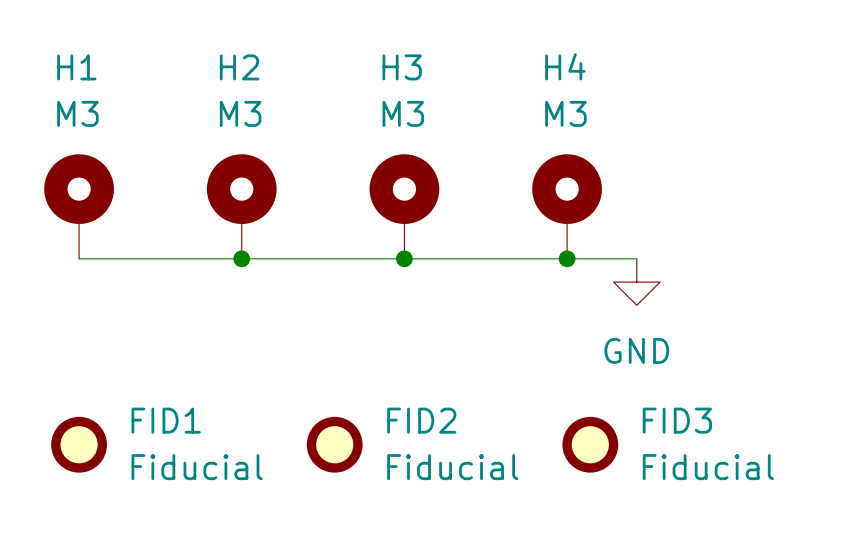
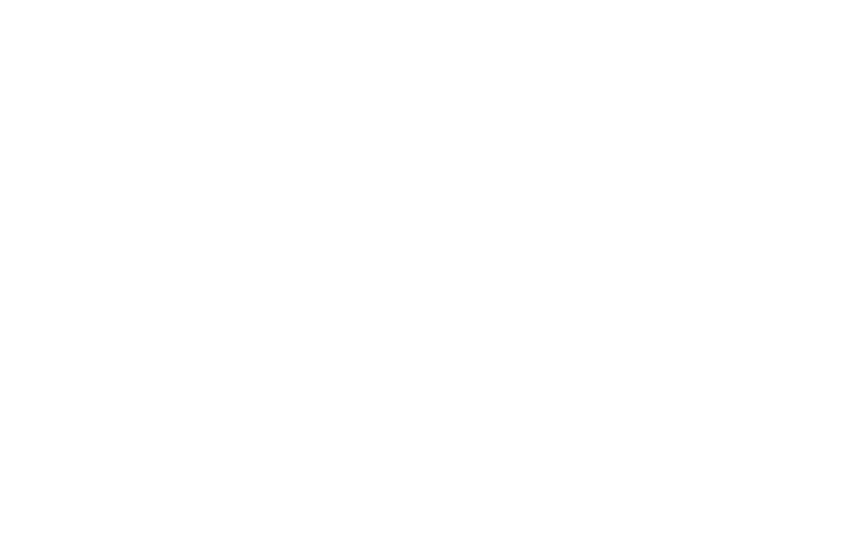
H1: M3 (79, 206) -> none
H2: M3 (241, 206) -> none
H3: M3 (404, 206) -> none
H4: M3 (567, 206) -> none
wire: (79, 258) (636, 258) -> none
junction: (241, 258) -> none
junction: (404, 258) -> none
junction: (567, 258) -> none
power symbol: GND (636, 282) -> none
FID1: Fiducial (79, 444) -> none
FID2: Fiducial (334, 444) -> none
FID3: Fiducial (590, 444) -> none

